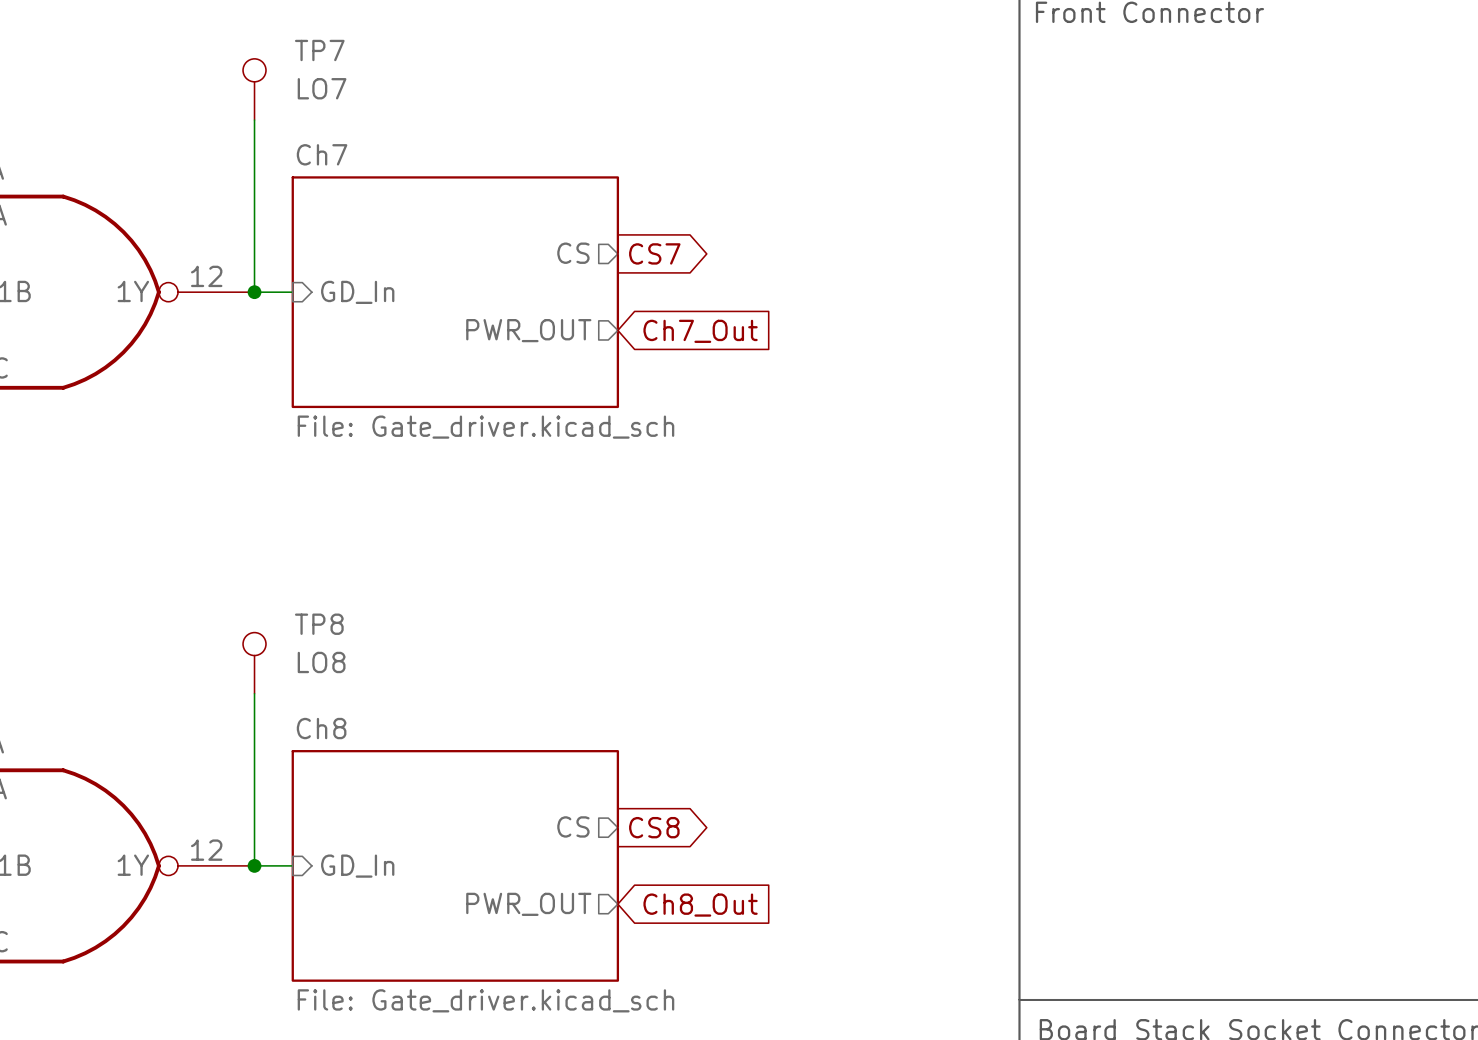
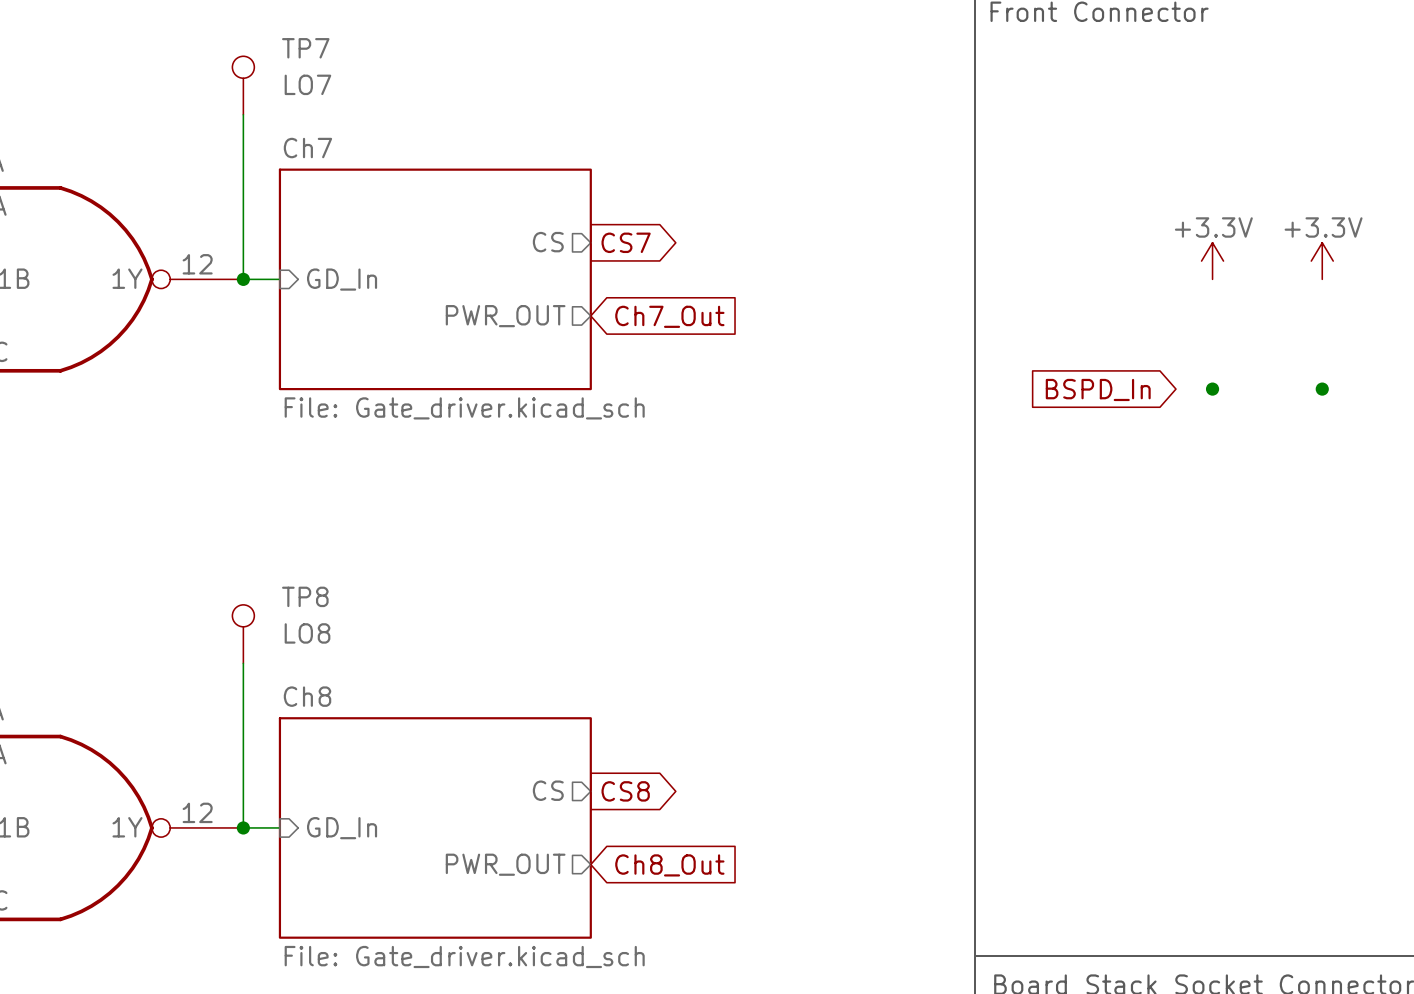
power symbol: none -> +3.3V (1212, 261)
power symbol: none -> +3.3V (1322, 261)
junction: none -> (1212, 389)
junction: none -> (1322, 389)
global label: none -> BSPD_In (1098, 389)

